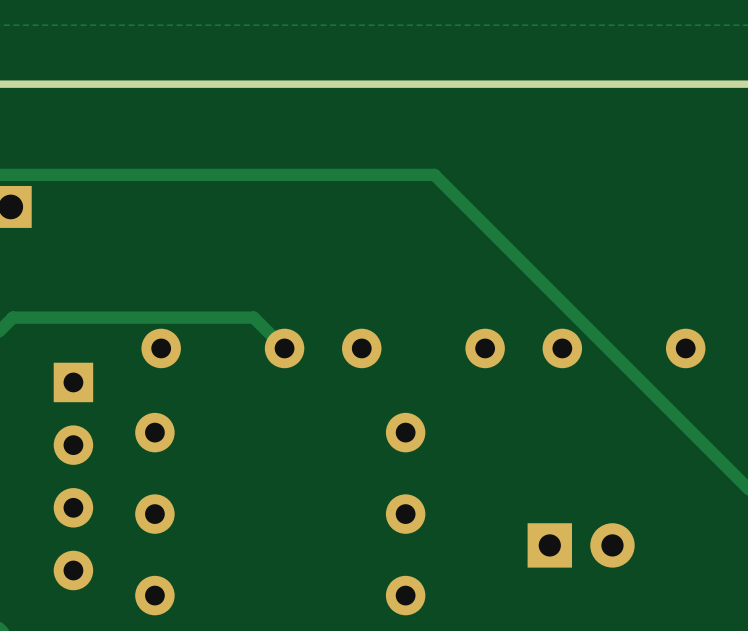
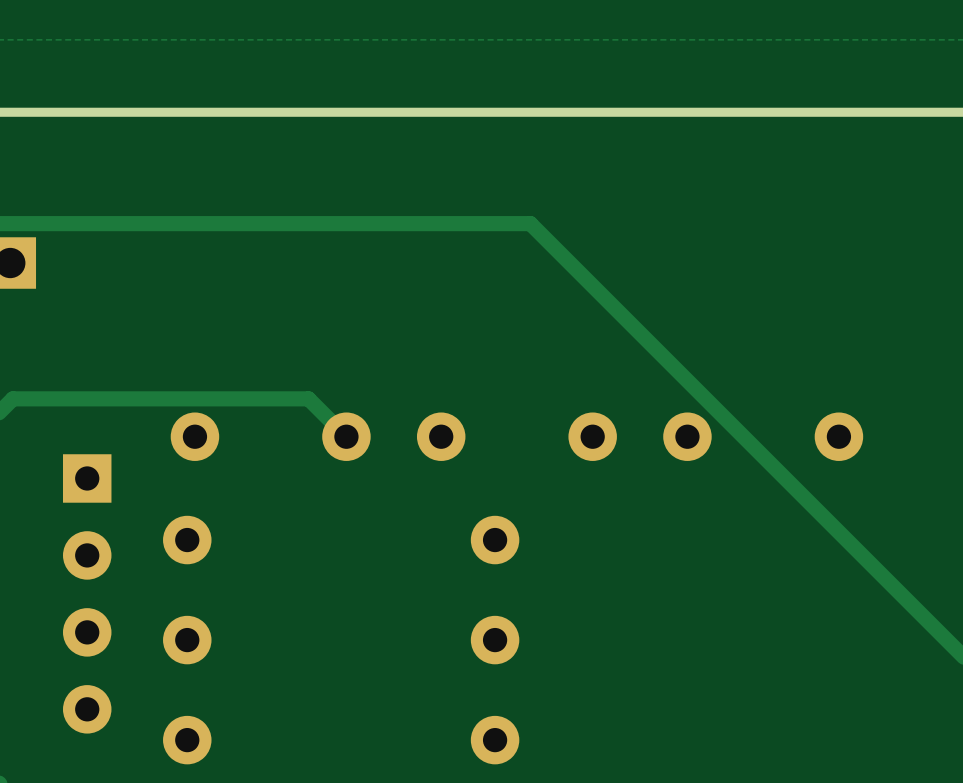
part: (581, 545) -> none

